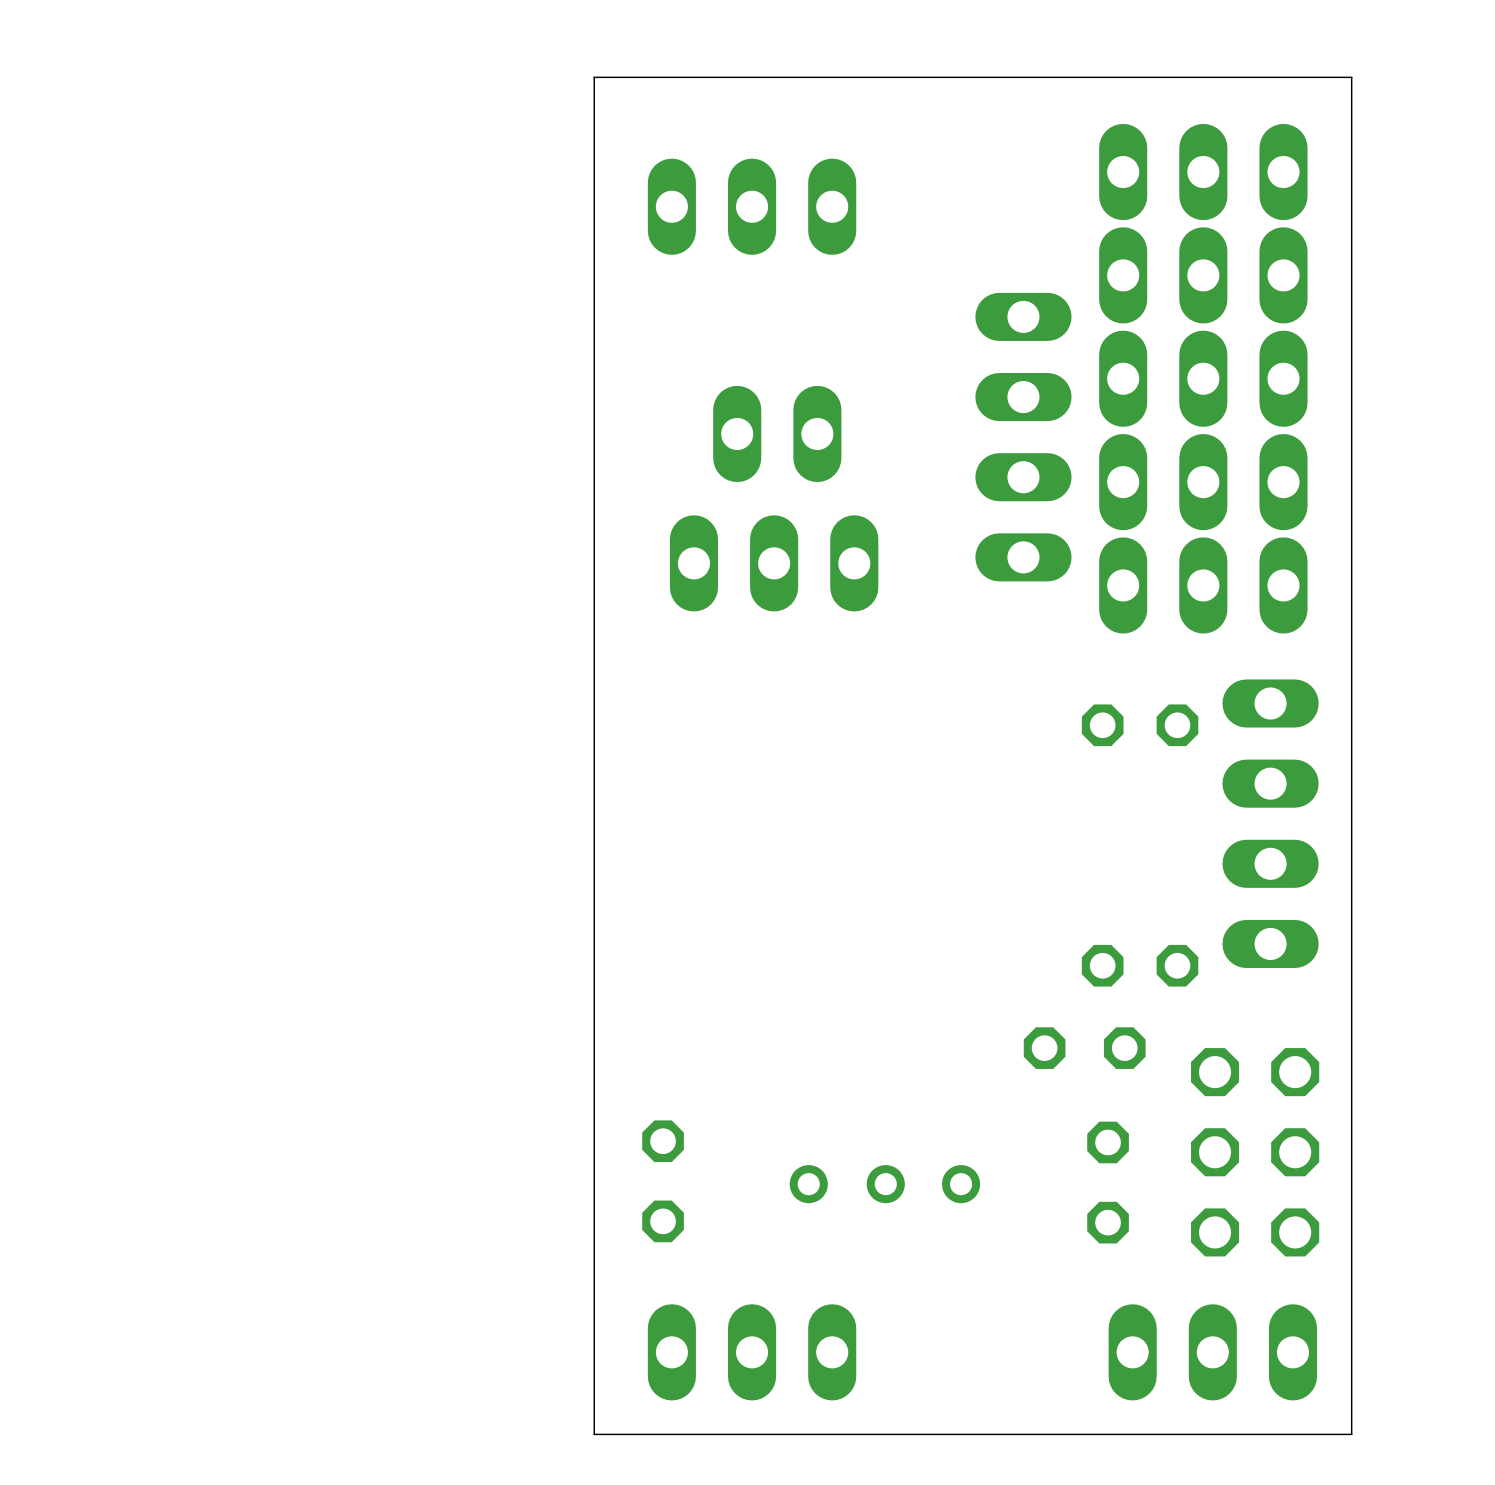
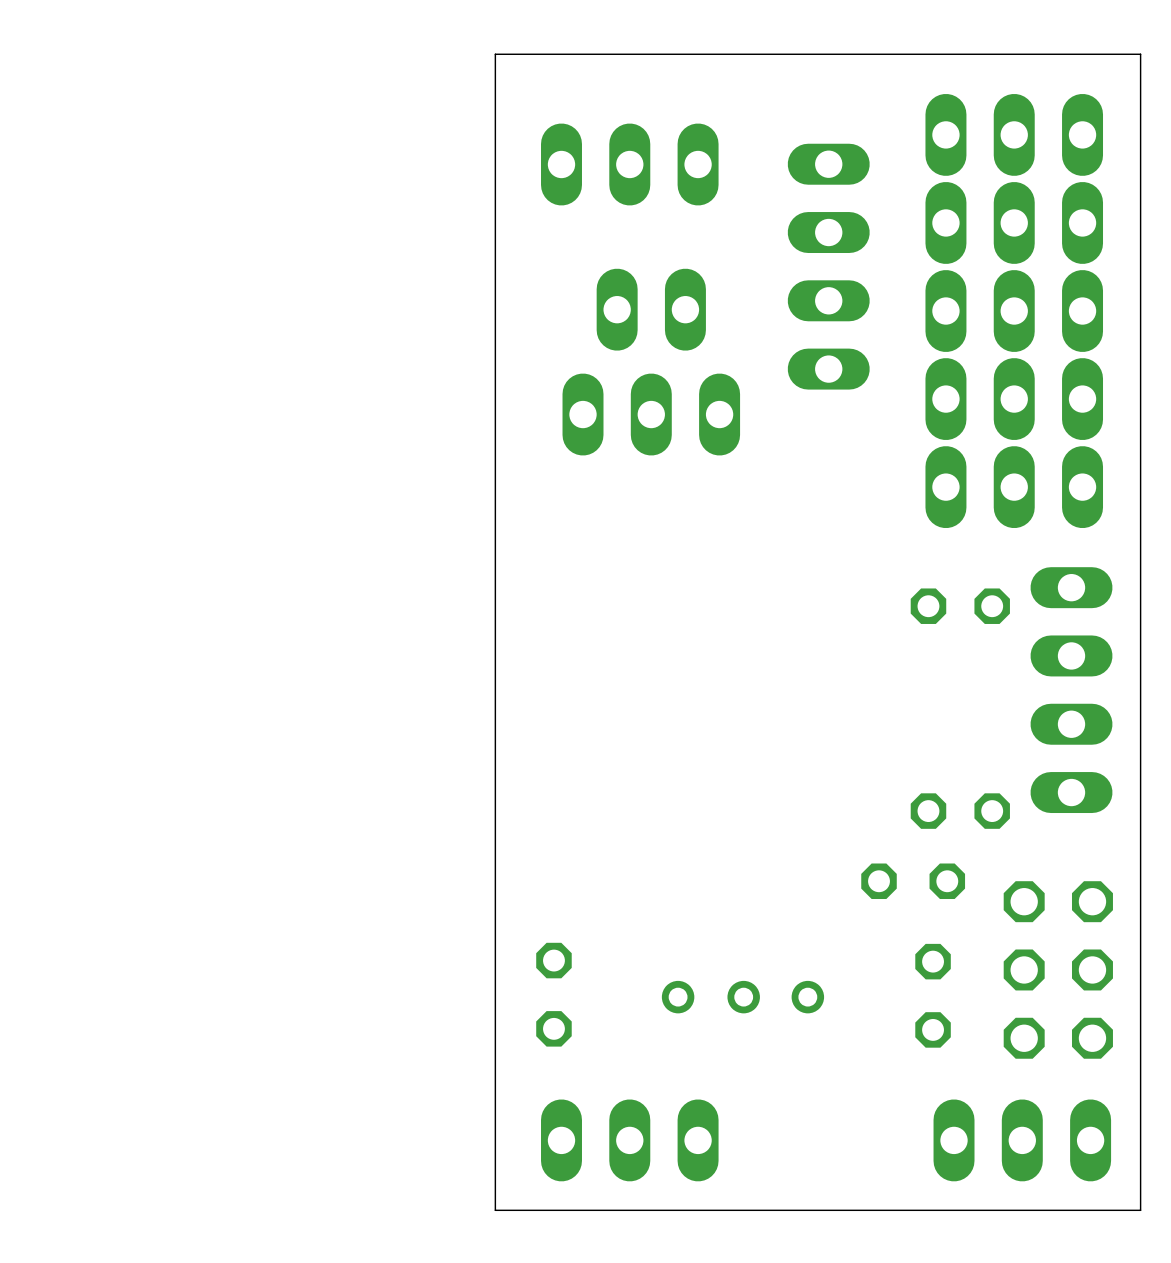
part position: (777, 433) -> (651, 309)
part position: (1023, 437) -> (828, 266)
part position: (774, 563) -> (651, 414)

